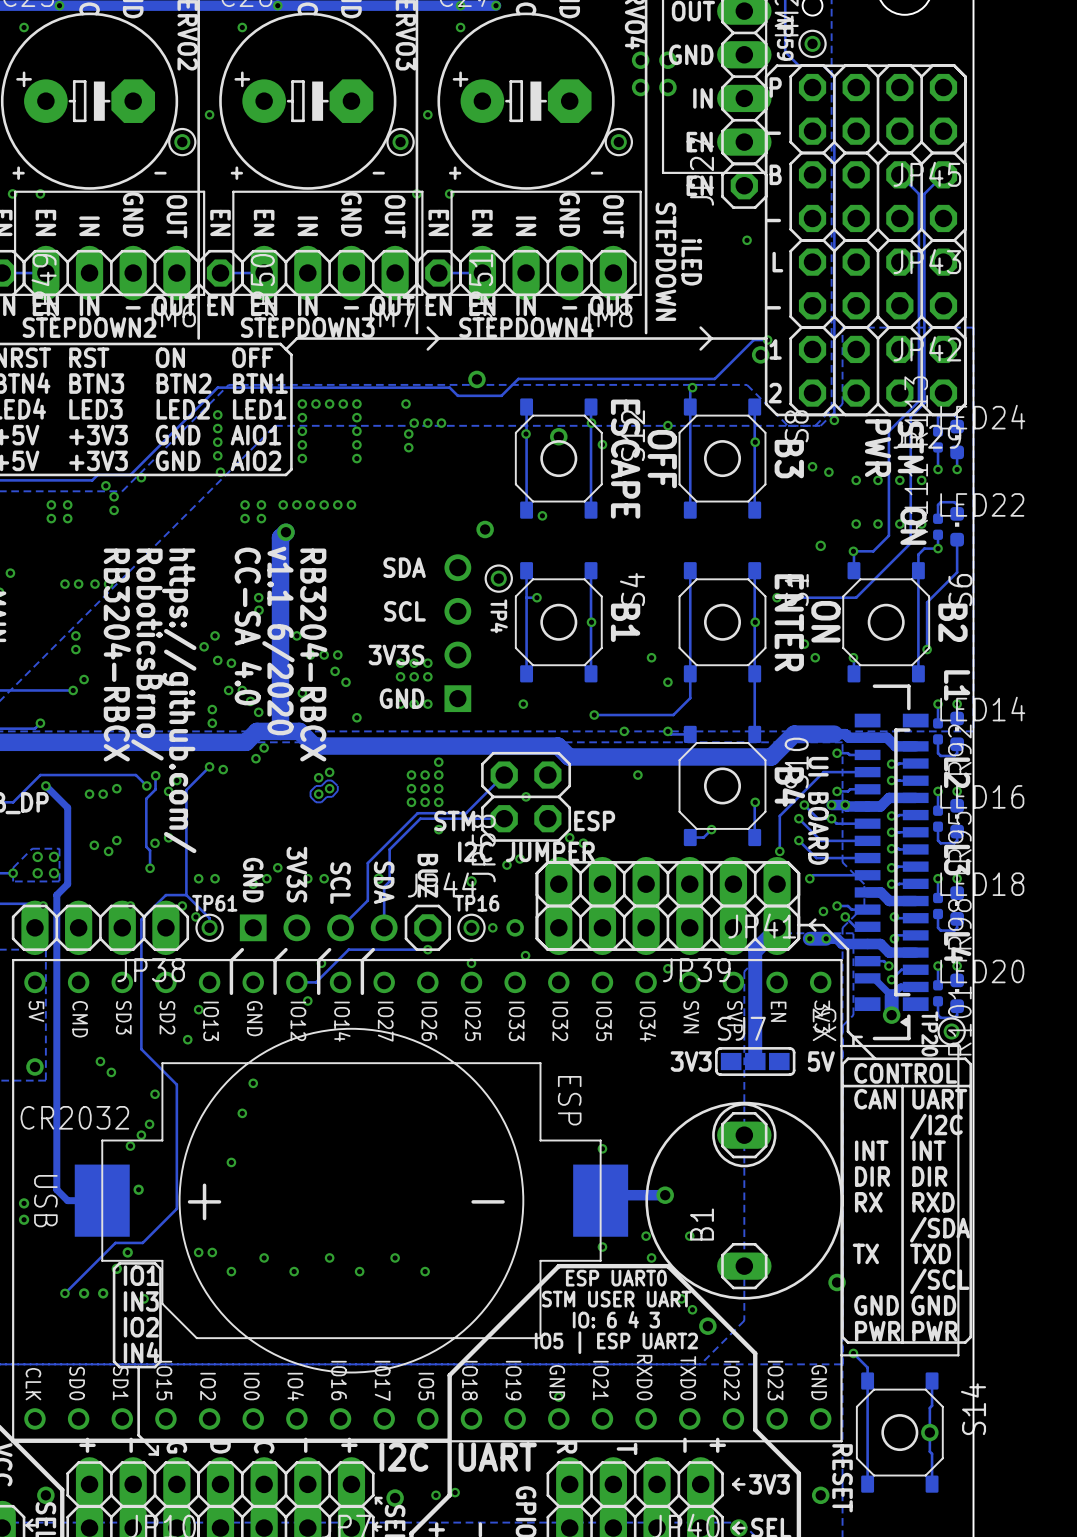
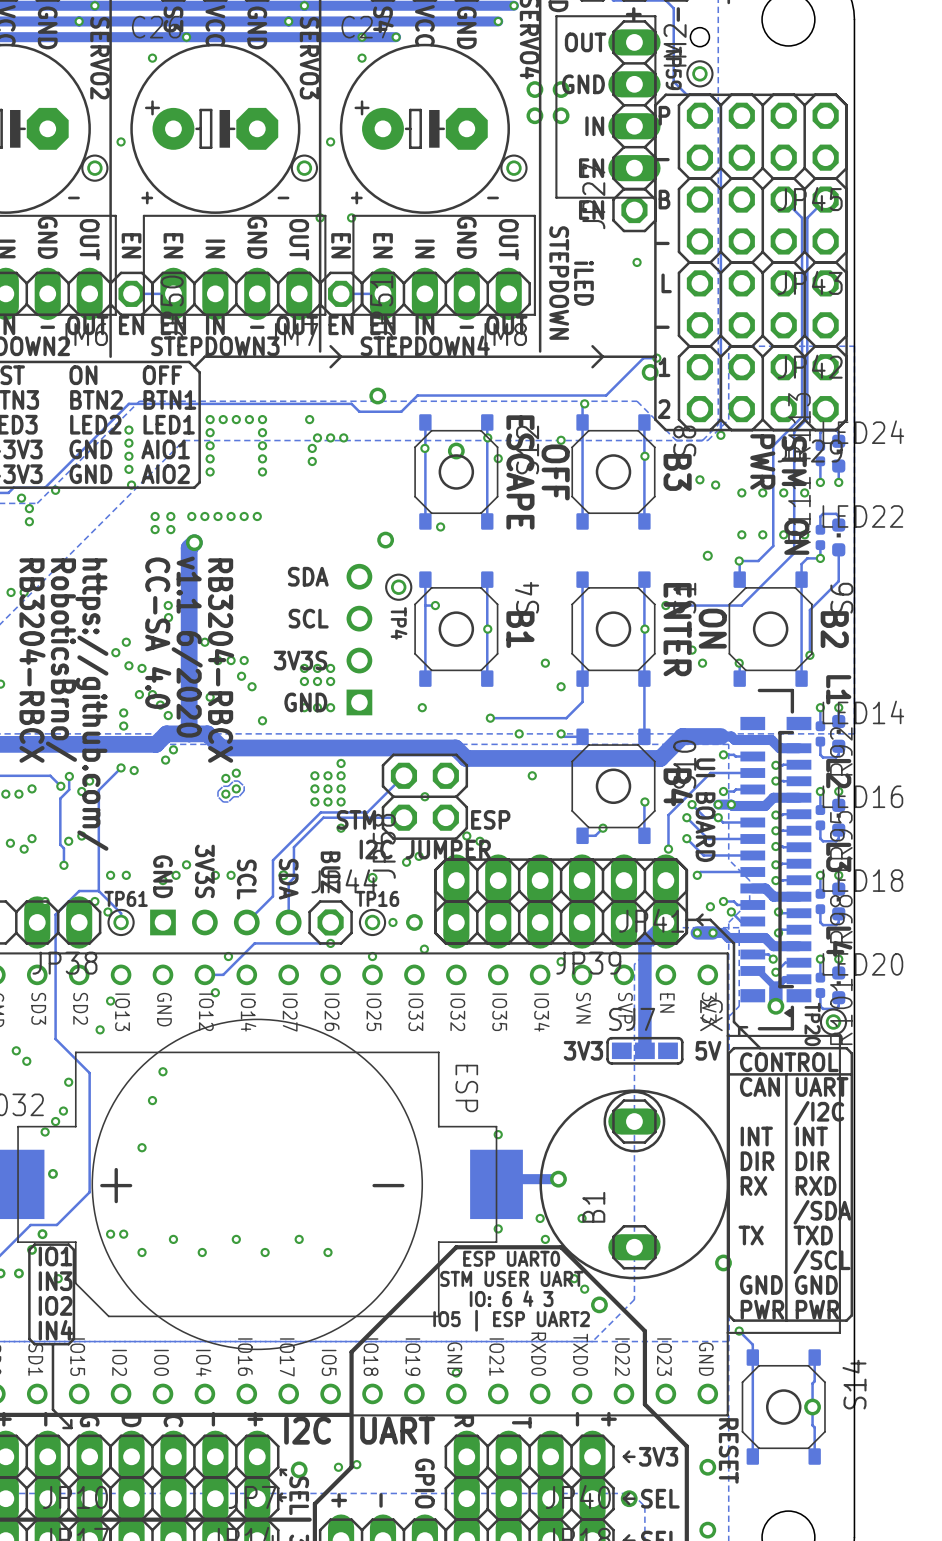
line: (242, 949) (231, 960) (231, 993) -> none
line: (285, 949) (275, 960) (275, 993) -> none
line: (329, 949) (318, 960) (318, 993) -> none
line: (373, 949) (362, 960) (362, 993) -> none

